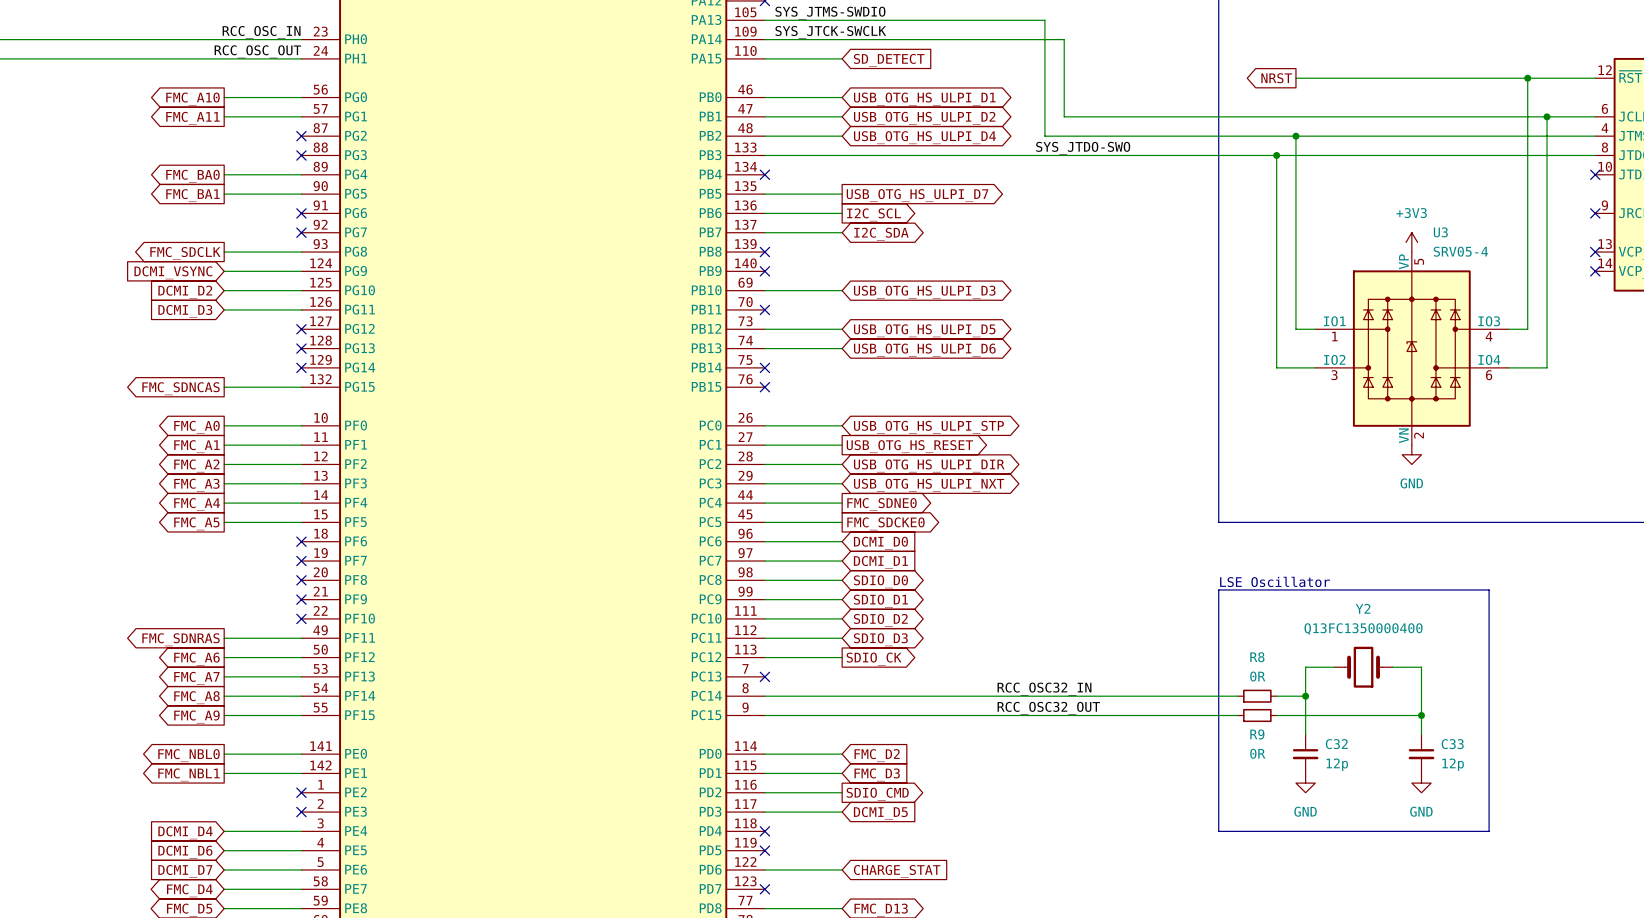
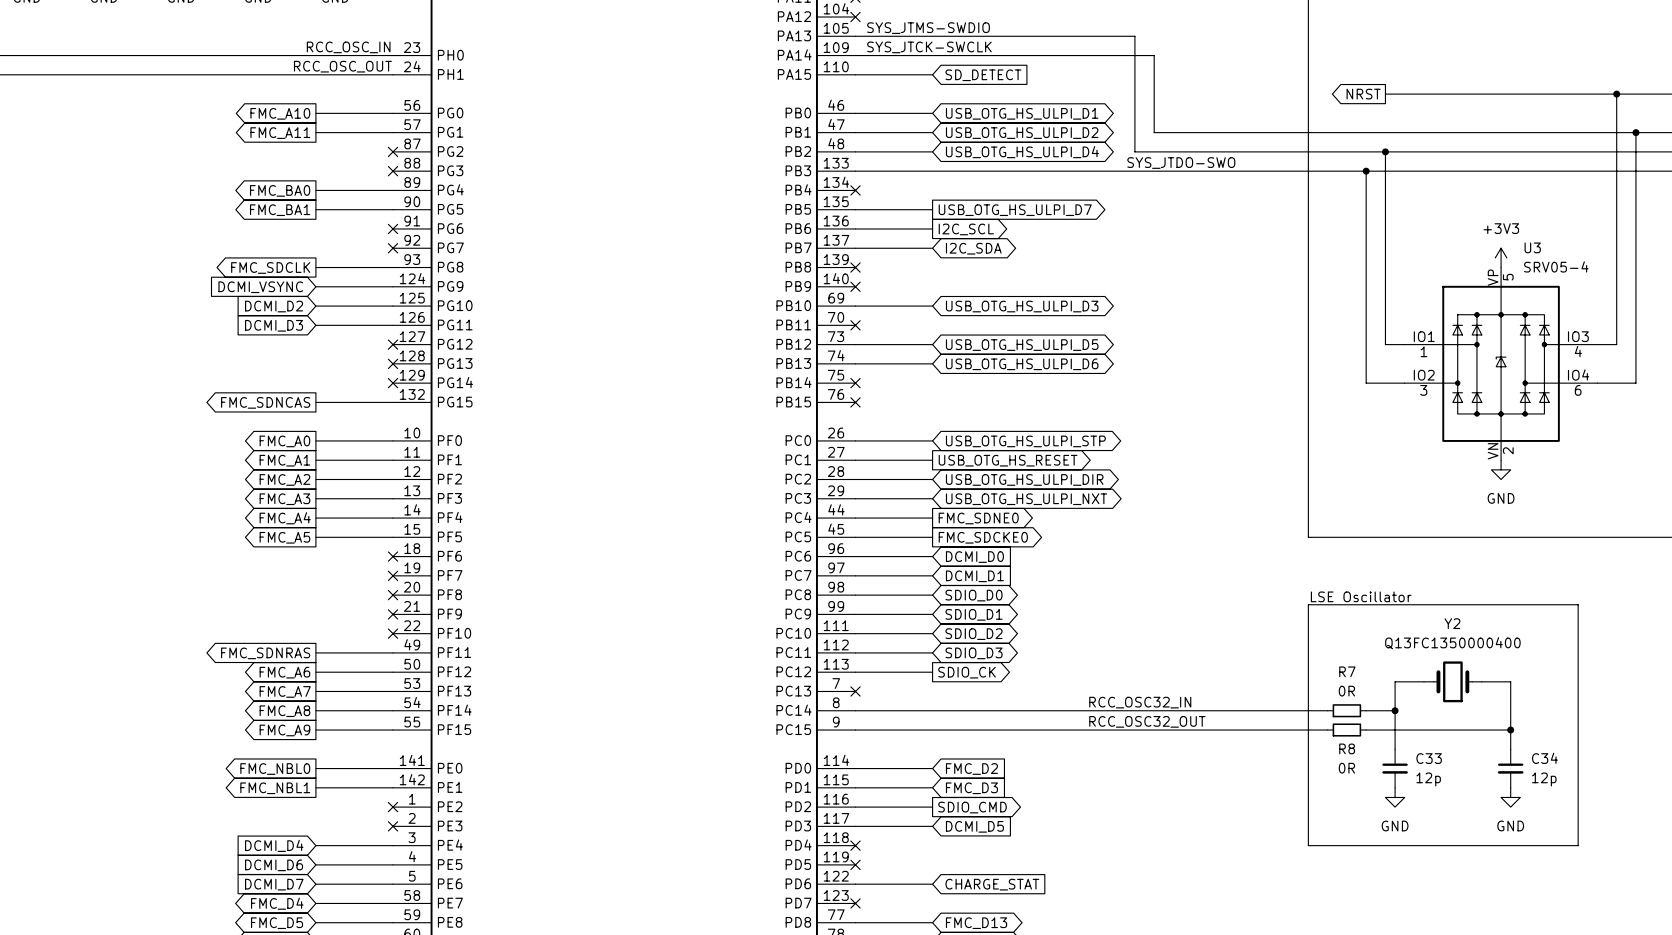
R8 name: R8 (1257, 657) -> R7 (1347, 671)
R9 name: R9 (1257, 734) -> R8 (1347, 748)
C32 name: C32 (1336, 744) -> C33 (1429, 758)
C33 name: C33 (1452, 744) -> C34 (1544, 758)

